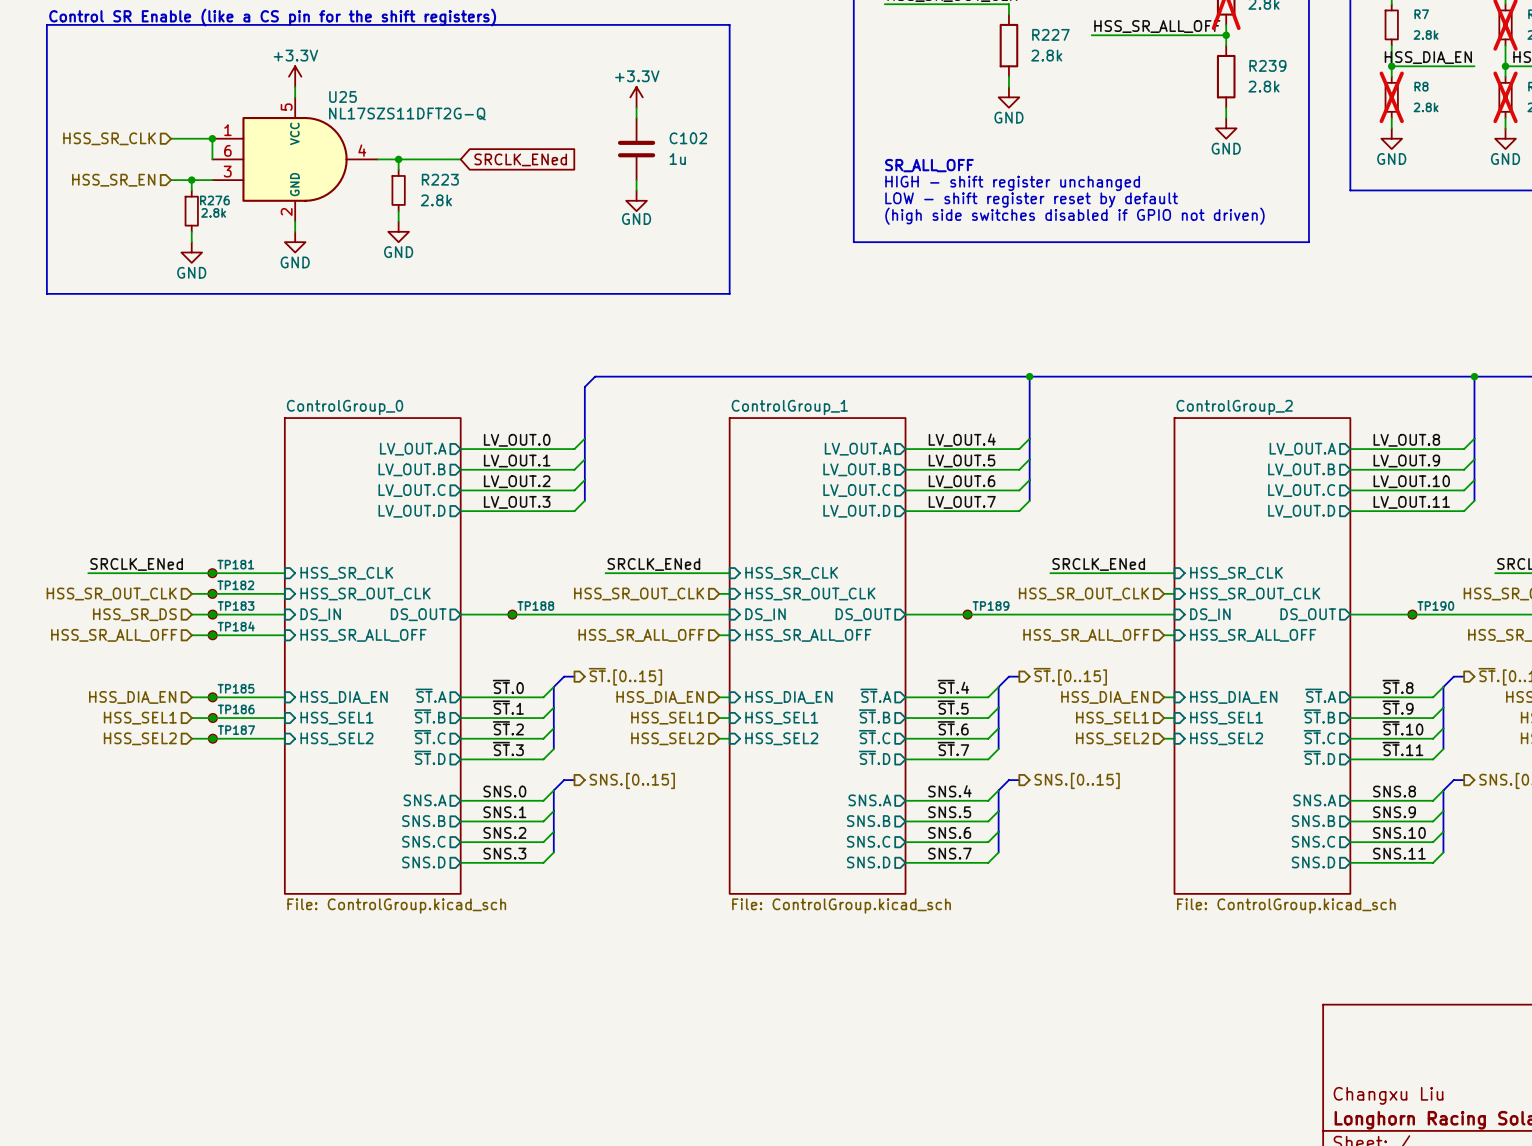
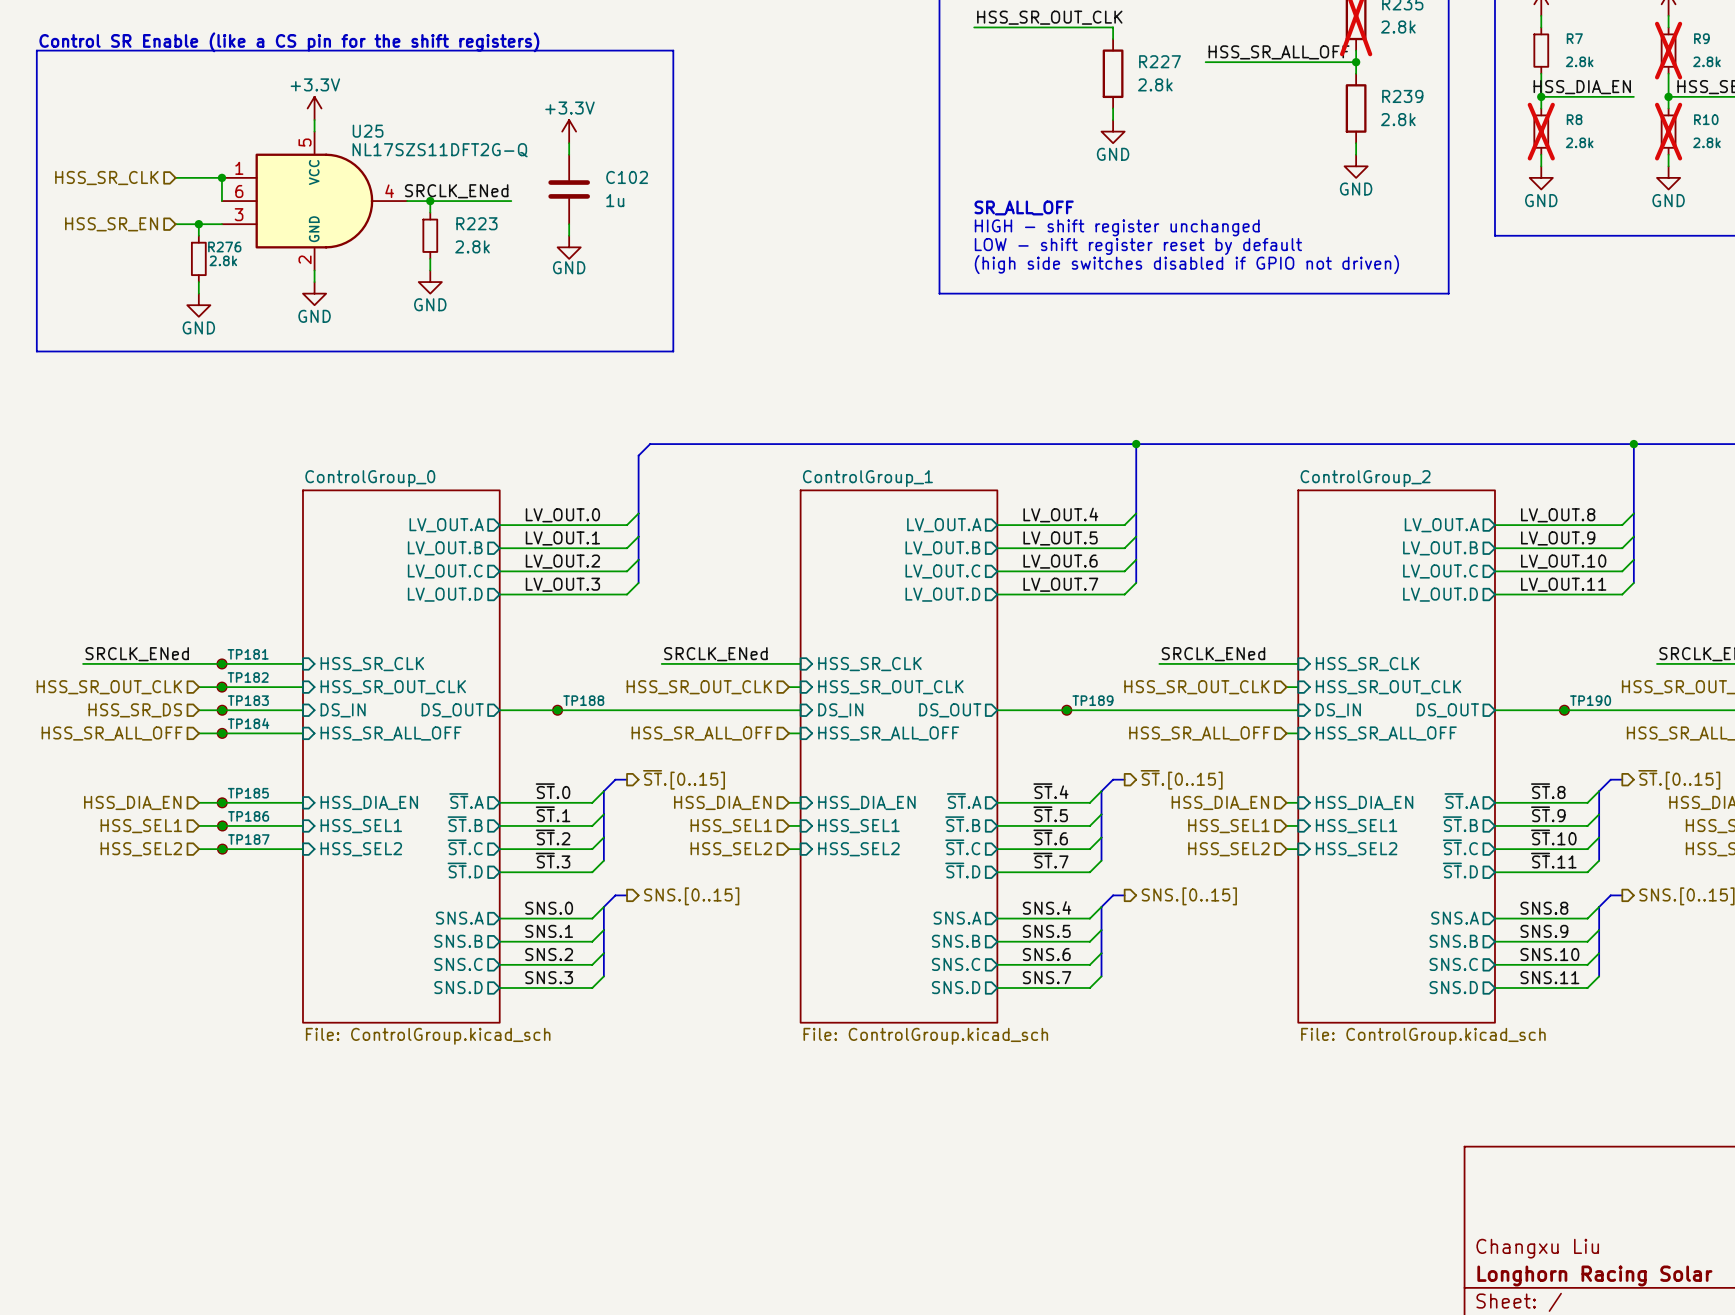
line: (615, 24) (729, 24) (729, 293) (615, 293) -> (673, 50) (673, 351)
power symbol position: +3.3V (636, 97) -> +3.3V (569, 131)
wire: (636, 107) (636, 118) -> (569, 143) (569, 154)
C102 position: (636, 149) -> (569, 189)
label: none -> SRCLK_ENed (456, 191)
wire: none -> (499, 201) (511, 201)
global label: SRCLK_ENed (520, 159) -> none
wire: (636, 180) (636, 190) -> (569, 224) (569, 235)
power symbol position: GND (636, 200) -> GND (569, 247)

